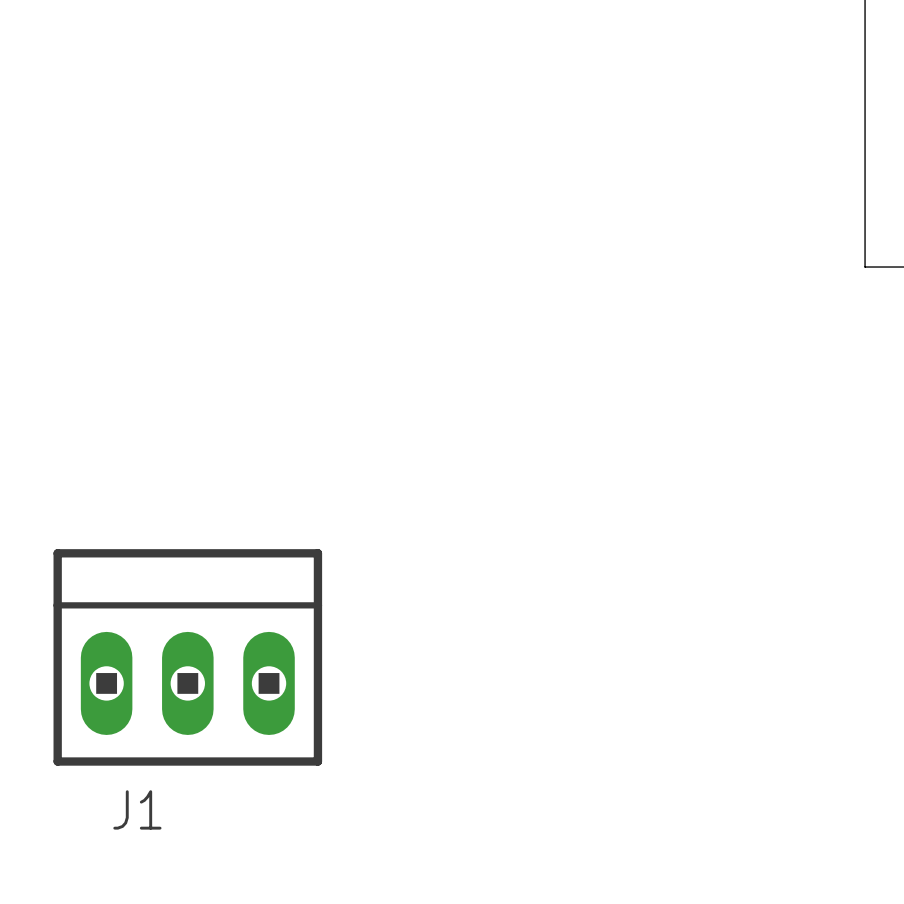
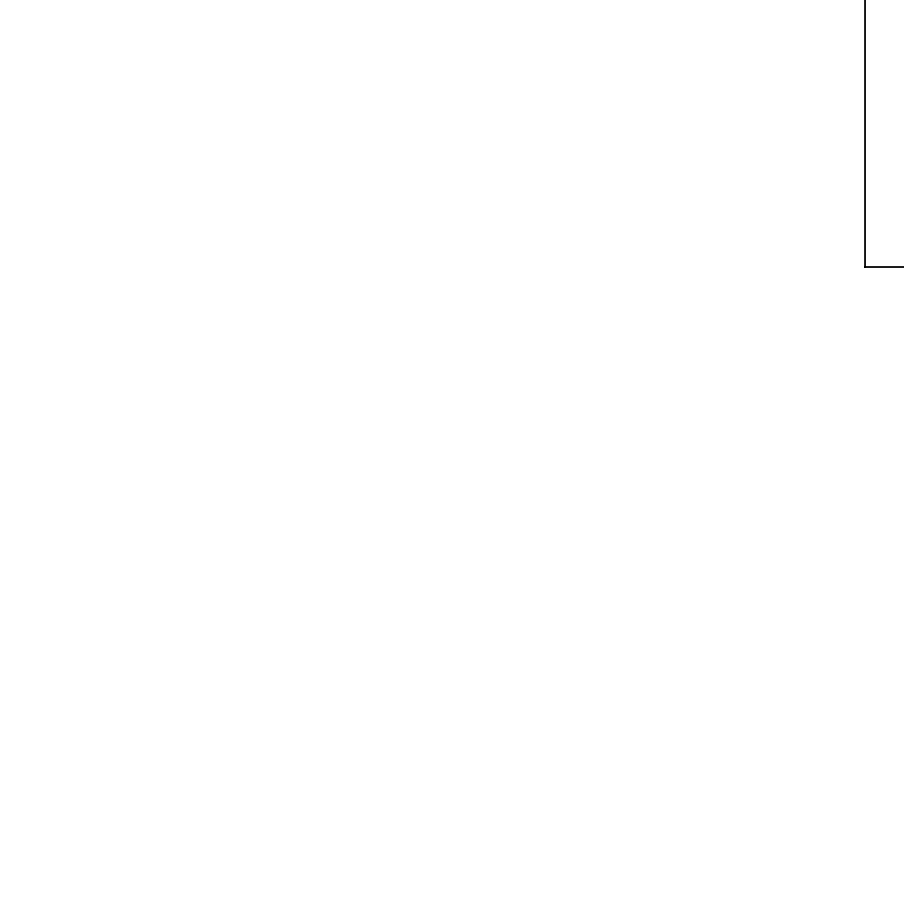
J1: (187, 657) -> none

